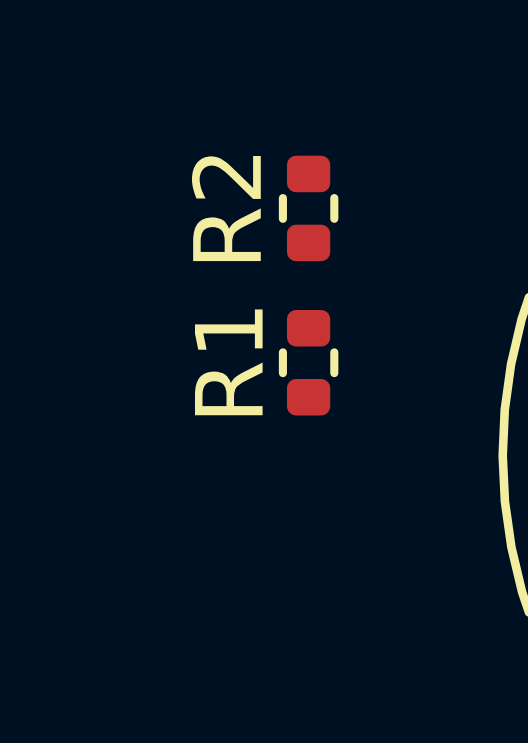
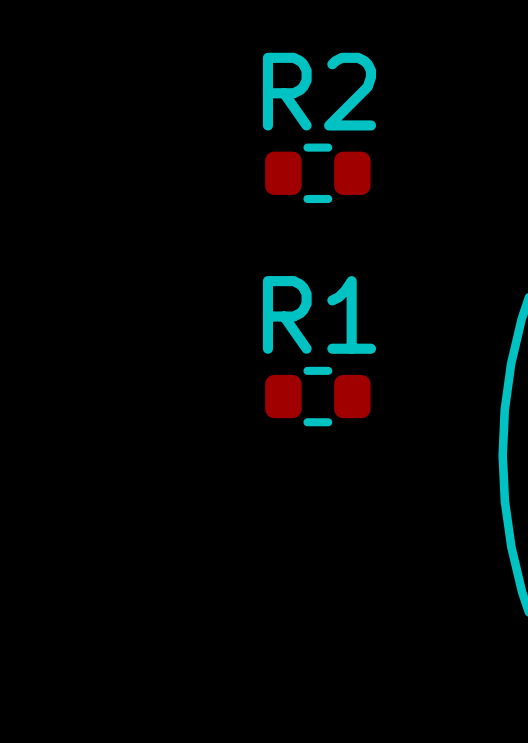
R2 rotation: 0° (308, 208) -> 90° clockwise (317, 173)
R1 rotation: 0° (308, 362) -> 90° clockwise (317, 396)

